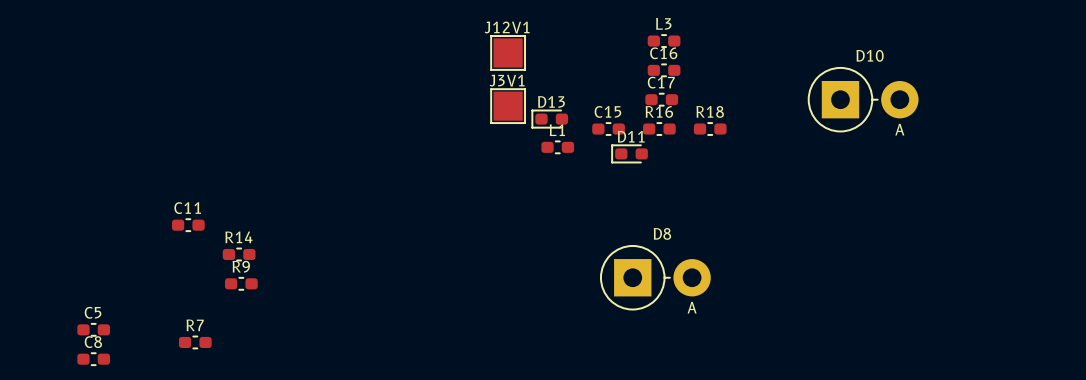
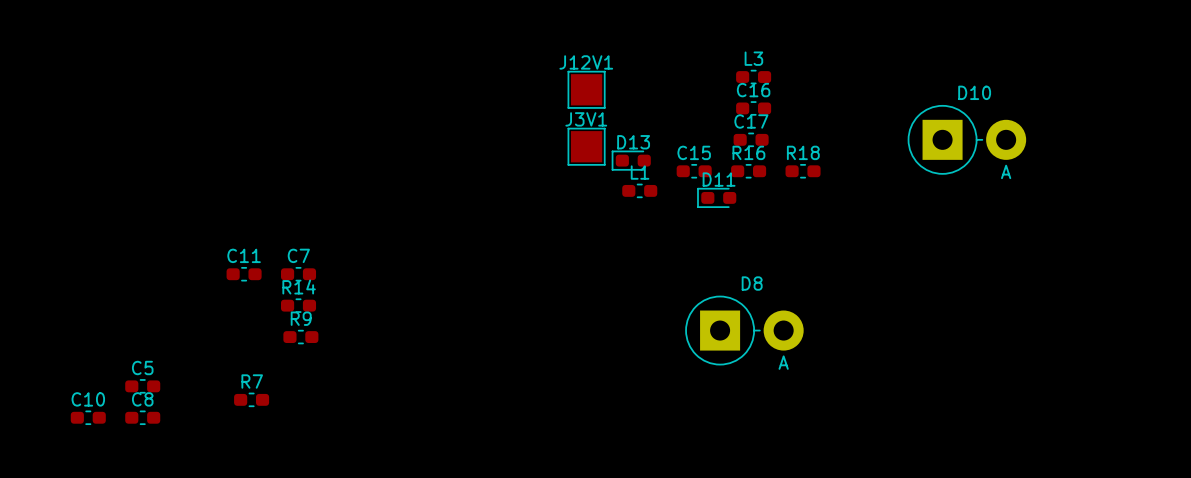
C7: none -> (298, 274)
C10: none -> (88, 417)

